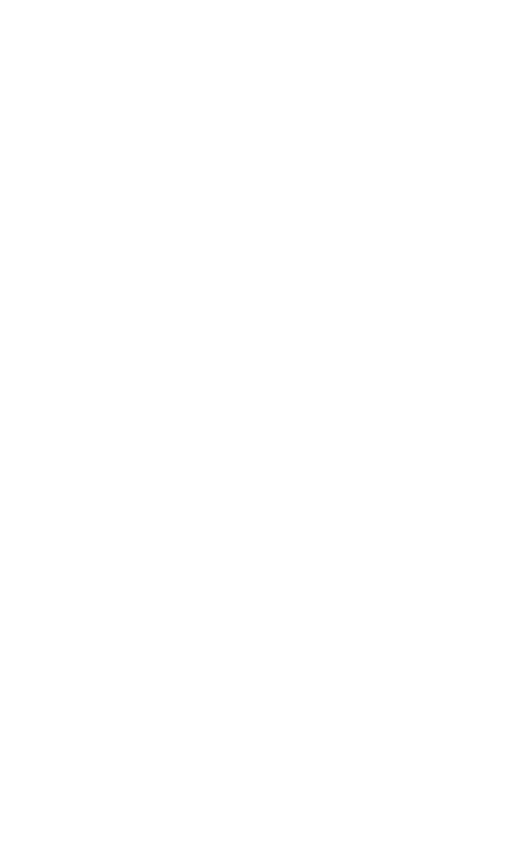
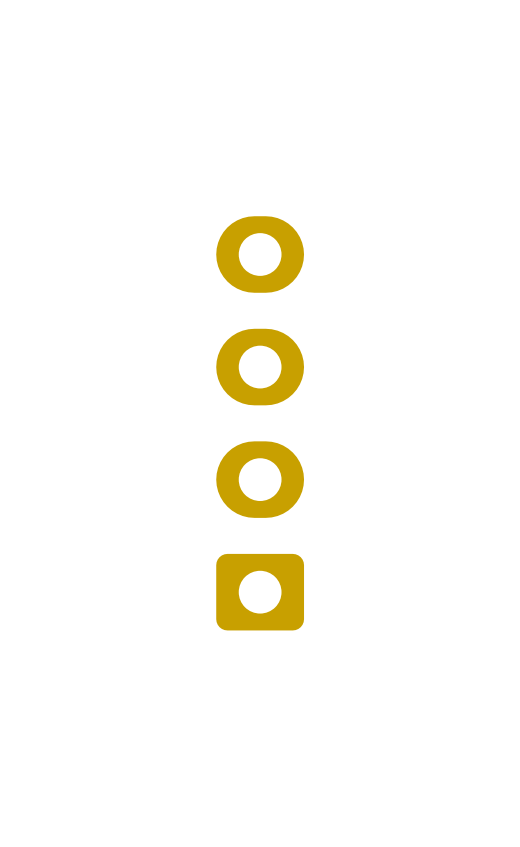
part: none -> (260, 423)

